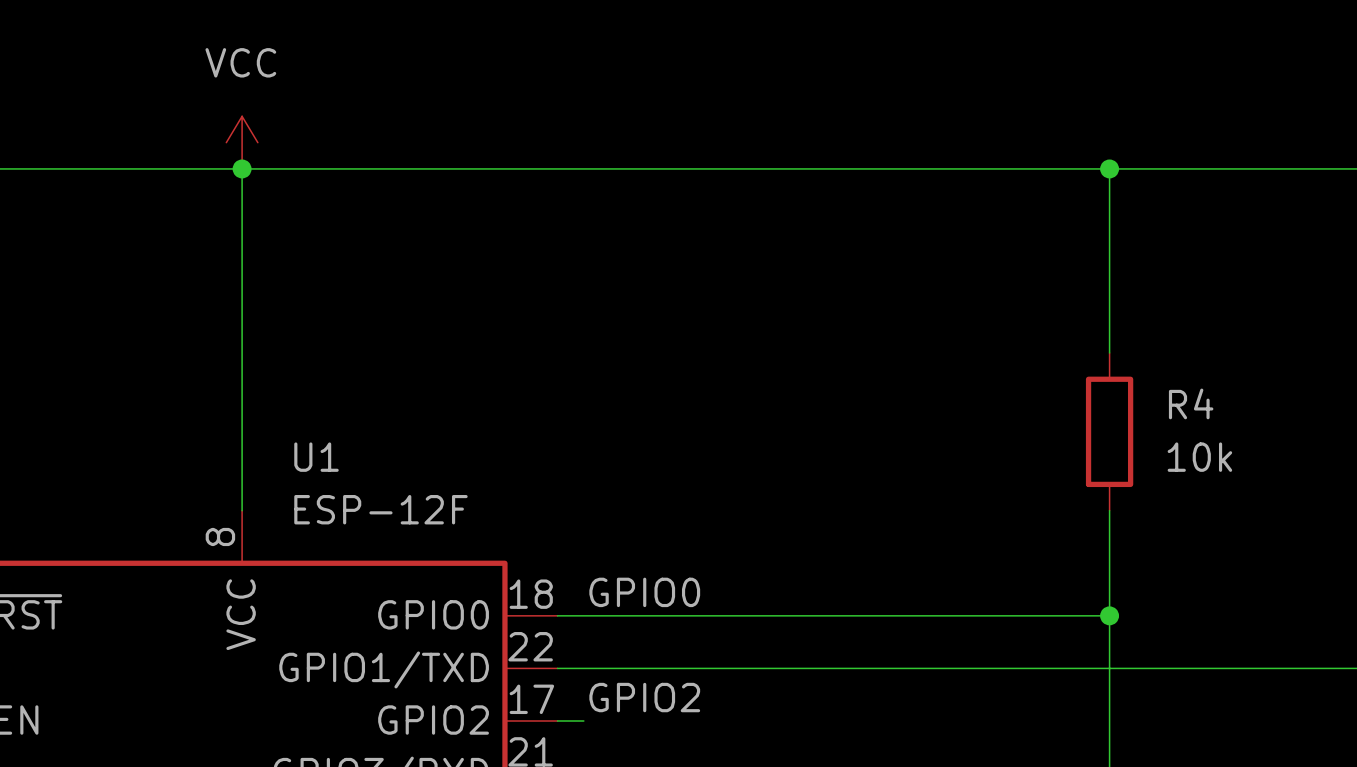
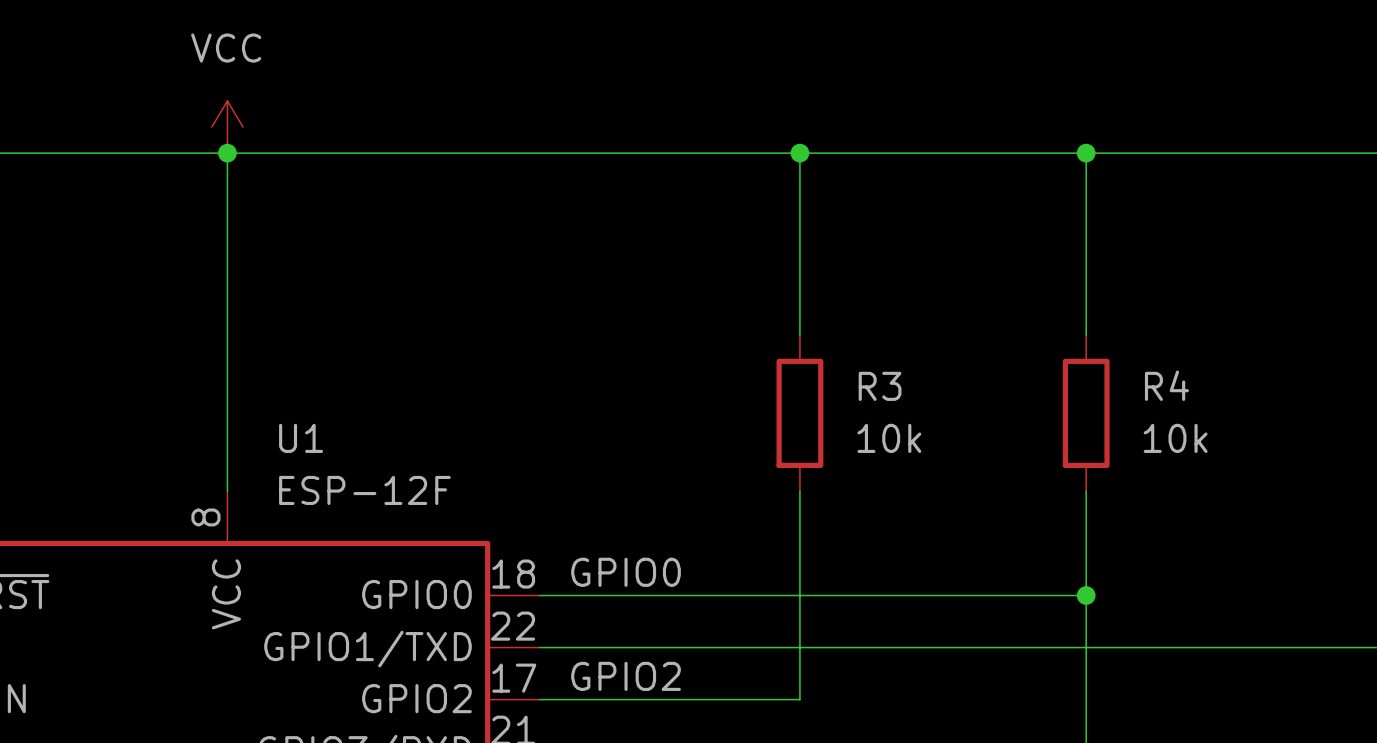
wire: none -> (799, 153) (799, 335)
junction: none -> (799, 153)
R3: none -> 10k (799, 413)
wire: none -> (799, 491) (799, 699) (565, 699)

